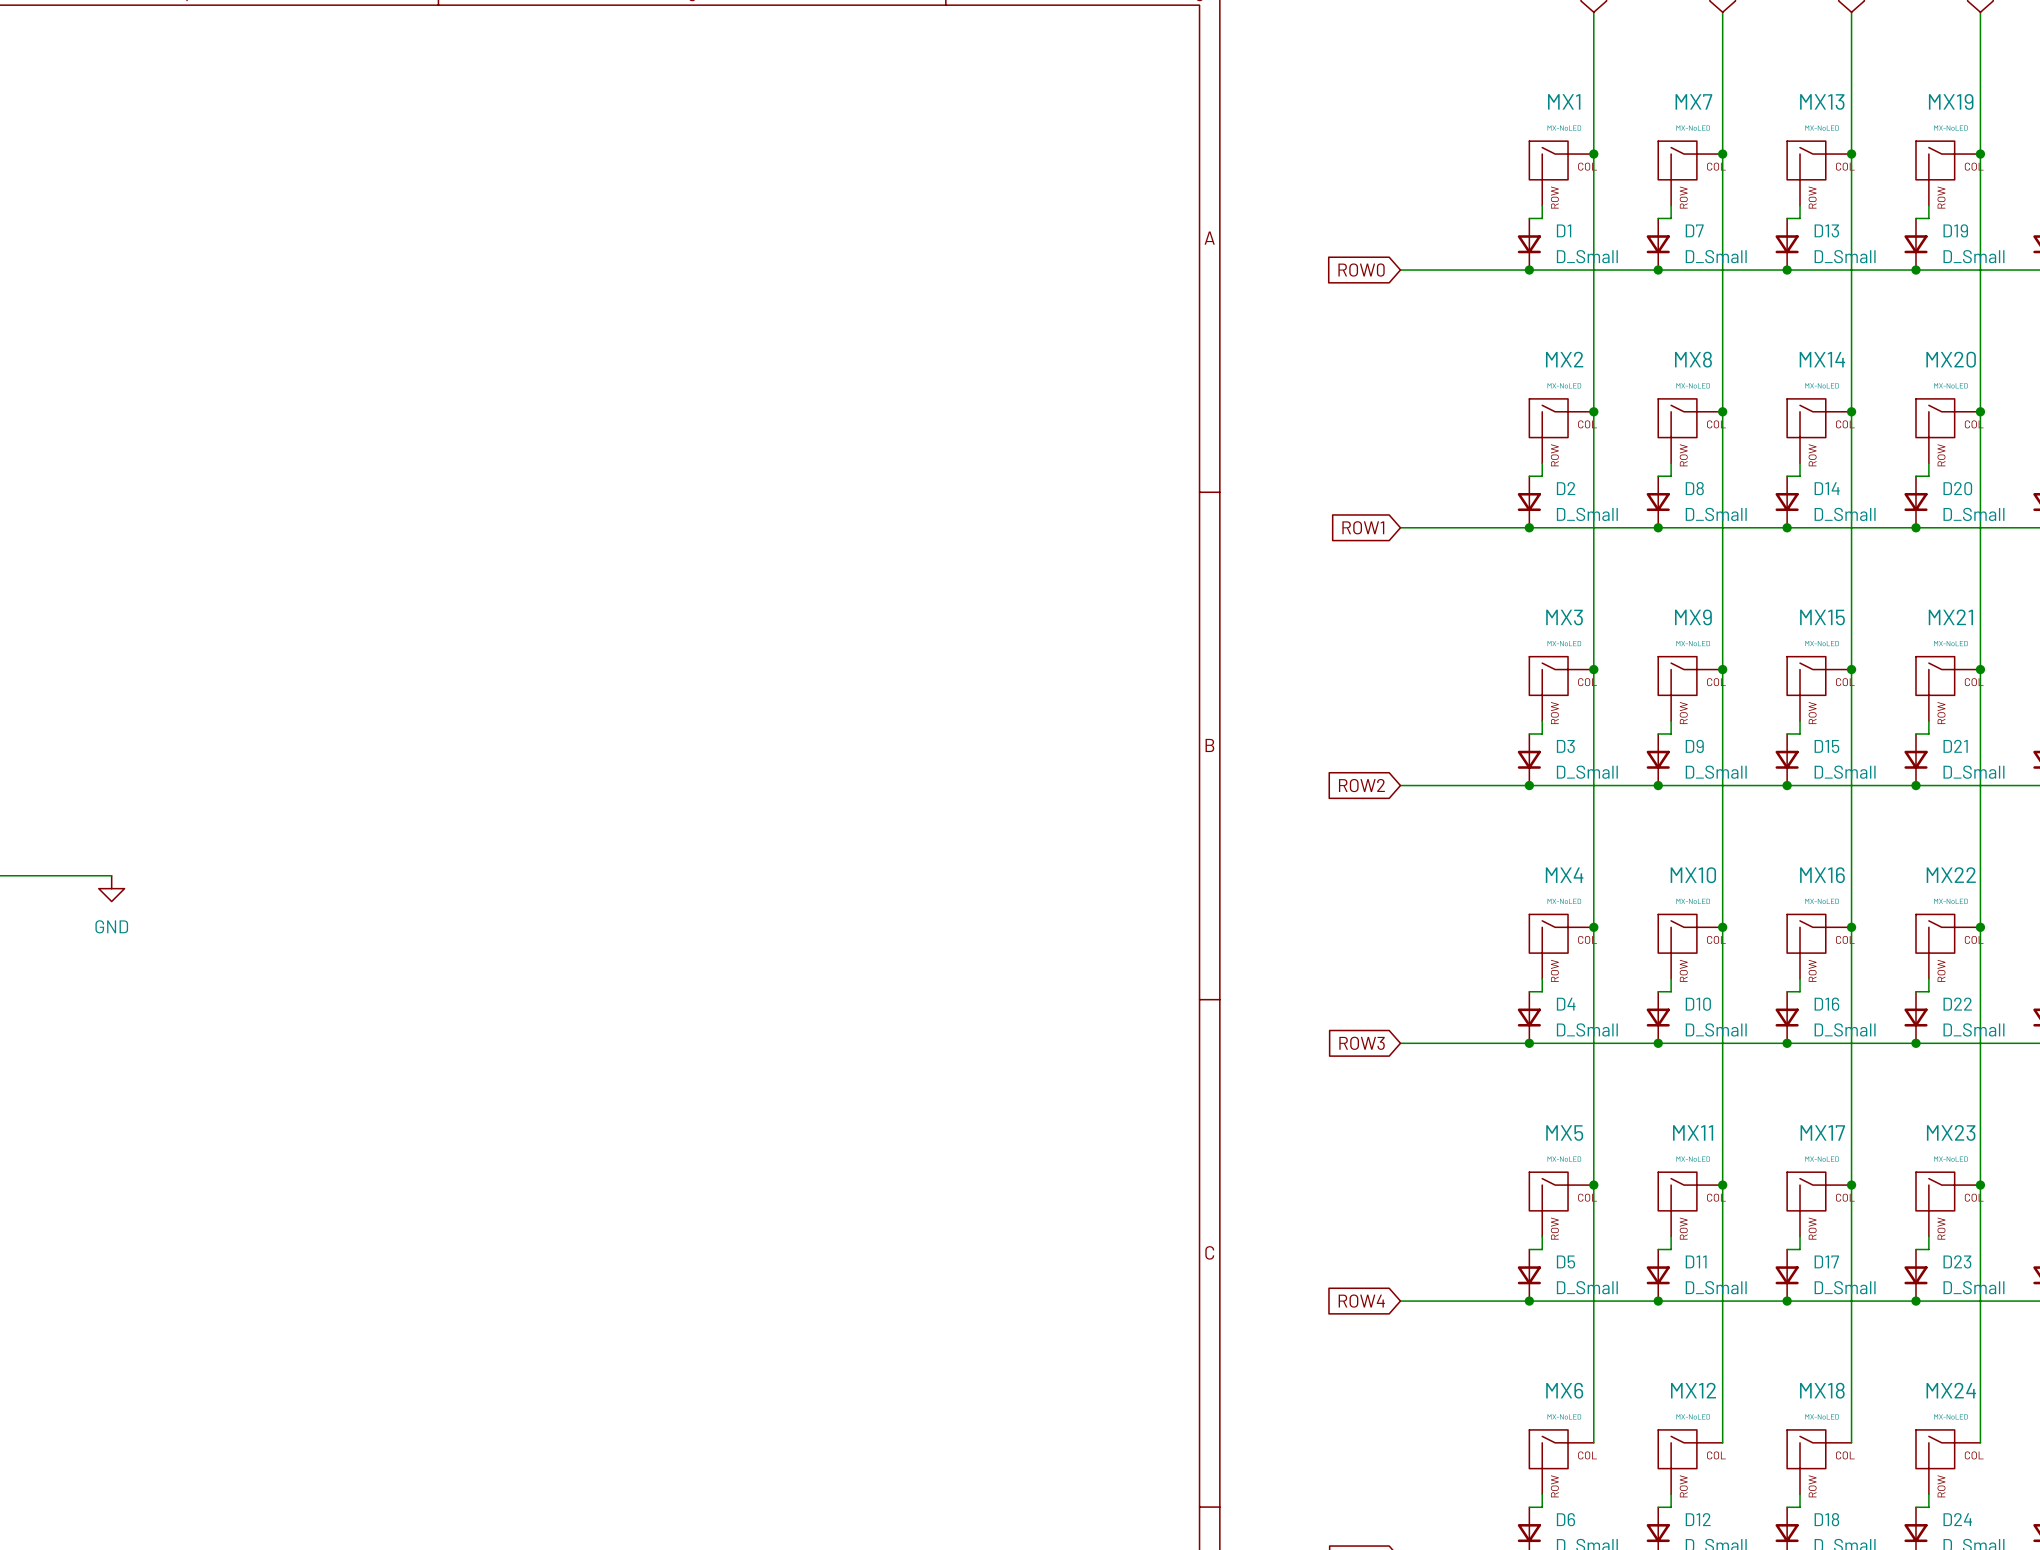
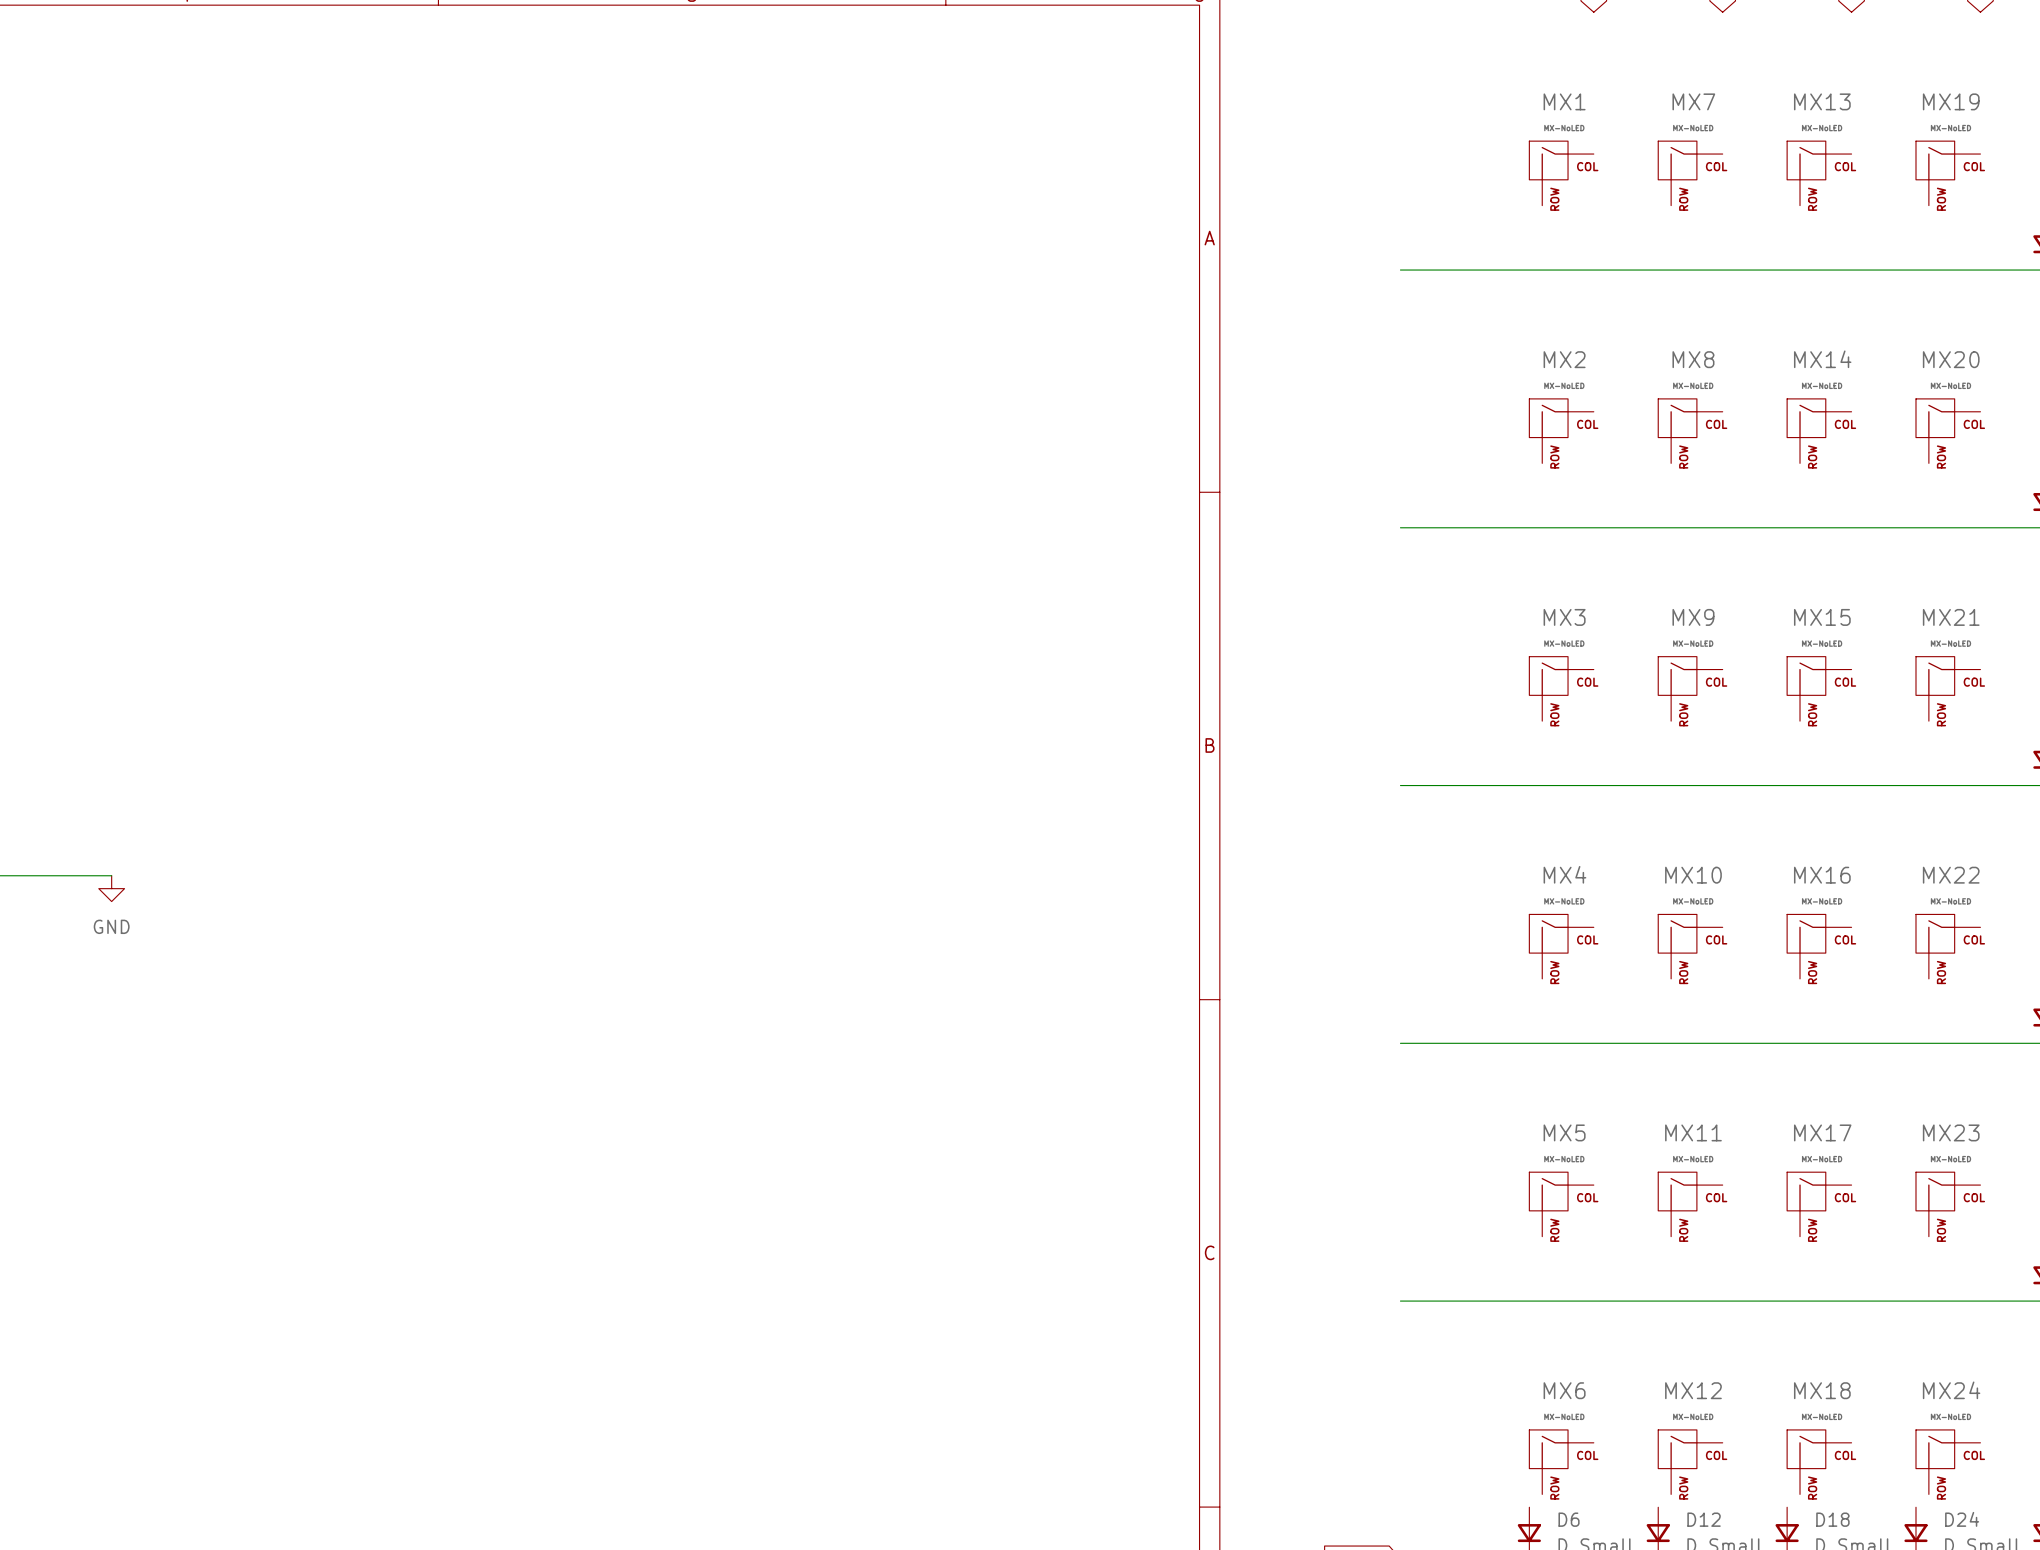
wire: (1593, 12) (1593, 1442) -> none
wire: (1722, 12) (1722, 1442) -> none
wire: (1851, 12) (1851, 1442) -> none
wire: (1980, 12) (1980, 1442) -> none
junction: (1593, 154) -> none
junction: (1722, 154) -> none
junction: (1851, 154) -> none
junction: (1980, 154) -> none
wire: (1542, 205) (1542, 218) (1529, 218) -> none
wire: (1671, 205) (1671, 218) (1658, 218) -> none
wire: (1800, 205) (1800, 218) (1787, 218) -> none
wire: (1928, 205) (1928, 218) (1915, 218) -> none
D1: D_Small (1529, 244) -> none
D7: D_Small (1658, 244) -> none
D13: D_Small (1787, 244) -> none
D19: D_Small (1915, 244) -> none
global label: ROW0 (1361, 270) -> none
junction: (1529, 270) -> none
junction: (1658, 270) -> none
junction: (1787, 270) -> none
junction: (1915, 270) -> none
junction: (1593, 411) -> none
junction: (1722, 411) -> none
junction: (1851, 411) -> none
junction: (1980, 411) -> none
wire: (1542, 463) (1542, 476) (1529, 476) -> none
wire: (1671, 463) (1671, 476) (1658, 476) -> none
wire: (1800, 463) (1800, 476) (1787, 476) -> none
wire: (1928, 463) (1928, 476) (1915, 476) -> none
D2: D_Small (1529, 502) -> none
D8: D_Small (1658, 502) -> none
D14: D_Small (1787, 502) -> none
D20: D_Small (1915, 502) -> none
global label: ROW1 (1363, 527) -> none
junction: (1529, 527) -> none
junction: (1658, 527) -> none
junction: (1787, 527) -> none
junction: (1915, 527) -> none
junction: (1593, 669) -> none
junction: (1722, 669) -> none
junction: (1851, 669) -> none
junction: (1980, 669) -> none
wire: (1542, 721) (1542, 733) (1529, 733) -> none
wire: (1671, 721) (1671, 733) (1658, 733) -> none
wire: (1800, 721) (1800, 733) (1787, 733) -> none
wire: (1928, 721) (1928, 733) (1915, 733) -> none
D3: D_Small (1529, 759) -> none
D9: D_Small (1658, 759) -> none
D15: D_Small (1787, 759) -> none
D21: D_Small (1915, 759) -> none
global label: ROW2 (1361, 785) -> none
junction: (1529, 785) -> none
junction: (1658, 785) -> none
junction: (1787, 785) -> none
junction: (1915, 785) -> none
junction: (1593, 927) -> none
junction: (1722, 927) -> none
junction: (1851, 927) -> none
junction: (1980, 927) -> none
wire: (1542, 978) (1542, 991) (1529, 991) -> none
wire: (1671, 978) (1671, 991) (1658, 991) -> none
wire: (1800, 978) (1800, 991) (1787, 991) -> none
wire: (1928, 978) (1928, 991) (1915, 991) -> none
D4: D_Small (1529, 1017) -> none
D10: D_Small (1658, 1017) -> none
D16: D_Small (1787, 1017) -> none
D22: D_Small (1915, 1017) -> none
global label: ROW3 (1362, 1043) -> none
junction: (1529, 1043) -> none
junction: (1658, 1043) -> none
junction: (1787, 1043) -> none
junction: (1915, 1043) -> none
junction: (1593, 1185) -> none
junction: (1722, 1185) -> none
junction: (1851, 1185) -> none
junction: (1980, 1185) -> none
wire: (1542, 1236) (1542, 1249) (1529, 1249) -> none
wire: (1671, 1236) (1671, 1249) (1658, 1249) -> none
wire: (1800, 1236) (1800, 1249) (1787, 1249) -> none
wire: (1928, 1236) (1928, 1249) (1915, 1249) -> none
D5: D_Small (1529, 1275) -> none
D11: D_Small (1658, 1275) -> none
D17: D_Small (1787, 1275) -> none
D23: D_Small (1915, 1275) -> none
global label: ROW4 (1361, 1301) -> none
junction: (1529, 1301) -> none
junction: (1658, 1301) -> none
junction: (1787, 1301) -> none
junction: (1915, 1301) -> none
wire: (1542, 1494) (1542, 1507) (1529, 1507) -> none
wire: (1671, 1494) (1671, 1507) (1658, 1507) -> none
wire: (1800, 1494) (1800, 1507) (1787, 1507) -> none
wire: (1928, 1494) (1928, 1507) (1915, 1507) -> none

